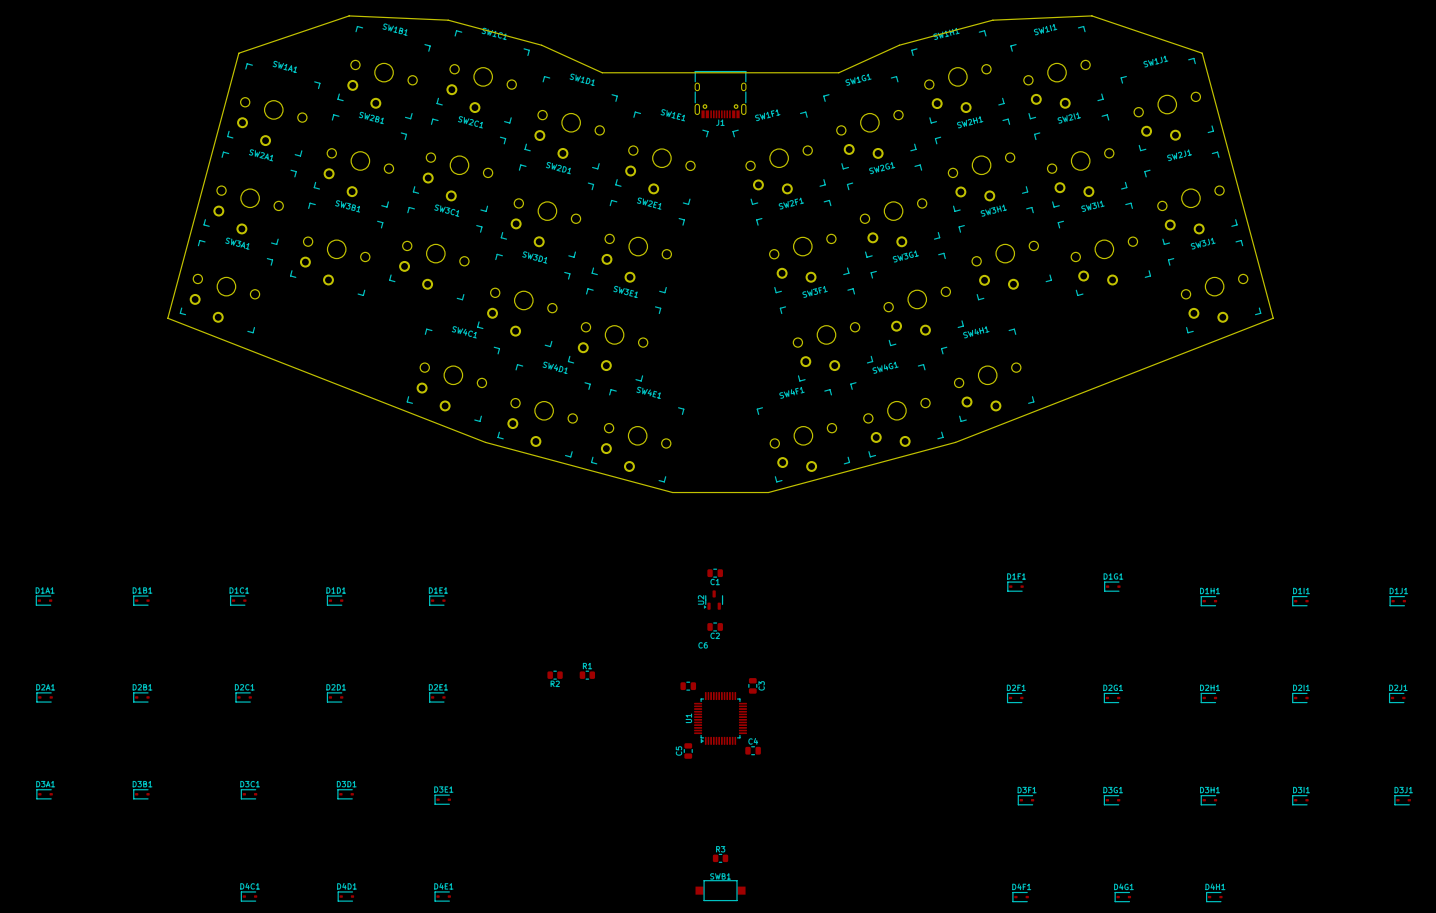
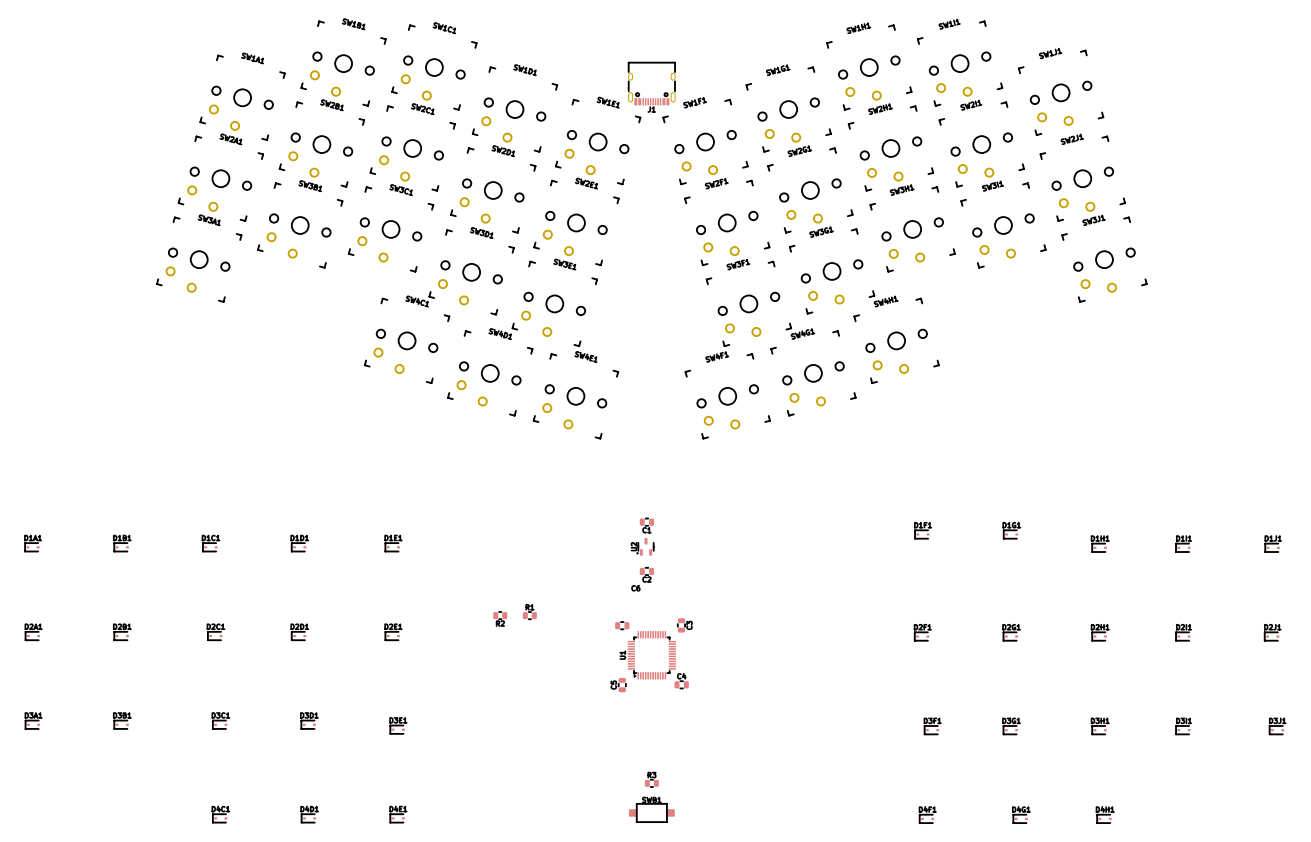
board edge: (349, 15) (448, 20) (541, 45) (602, 72) (838, 72) (899, 45) (992, 20) (1091, 15) (1202, 53) (1273, 318) (955, 442) (768, 492) (672, 492) (485, 442) (167, 318) (238, 53) (349, 15) -> none

